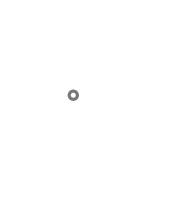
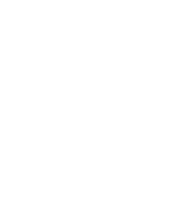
via: (73, 95) -> none

